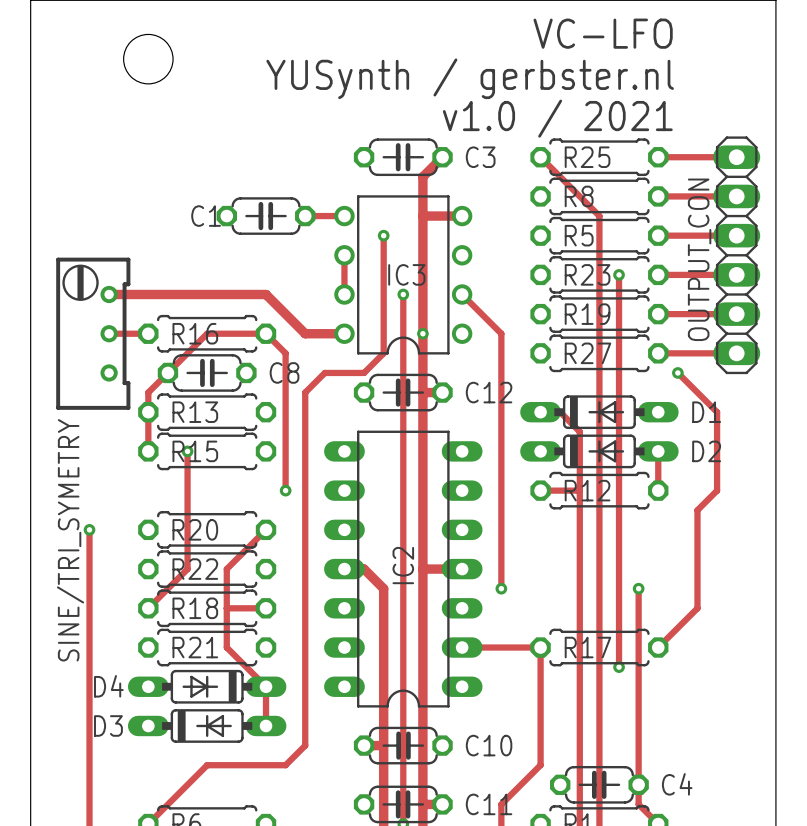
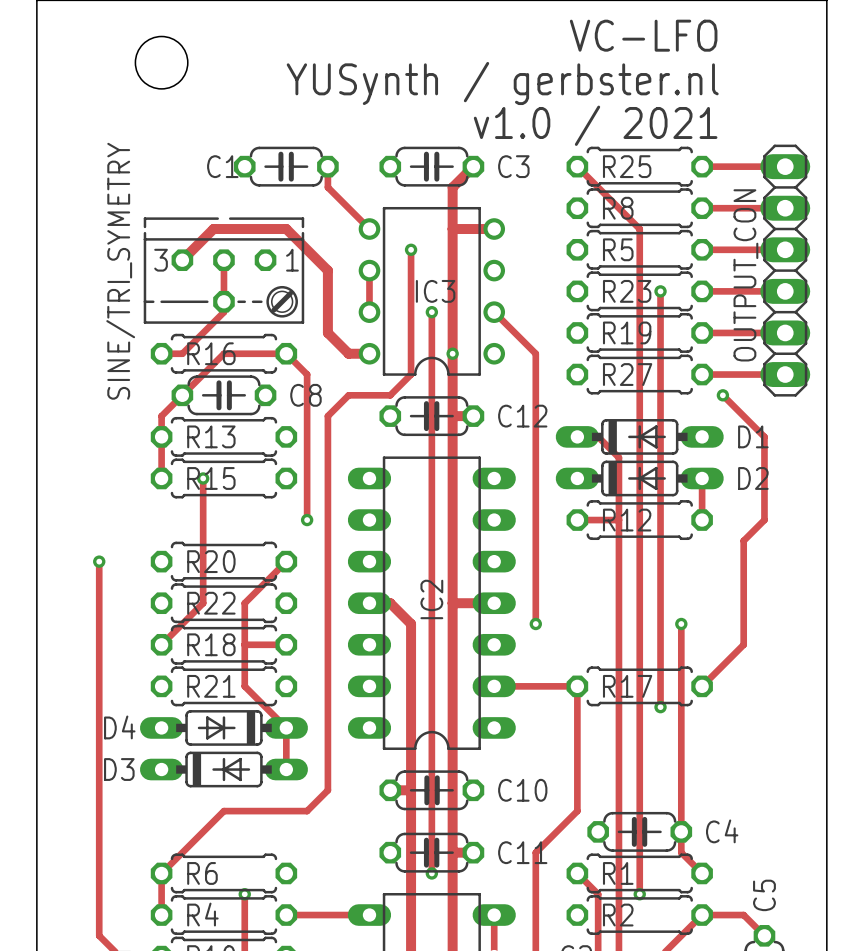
C1 position: (266, 216) -> (286, 166)
track: (305, 216) (344, 216) -> (327, 166) (327, 187) (369, 229)
SINE/TRI_SYMETRY: none -> (223, 270)
track: (109, 294) (266, 294) (305, 333) (324, 333) -> (182, 260) (213, 229) (286, 229) (327, 270) (327, 332) (348, 353)
SINE/TRI_SYMETRY: (93, 333) -> none
track: (109, 333) (148, 333) -> (223, 260) (223, 312) (182, 353) (161, 353)

